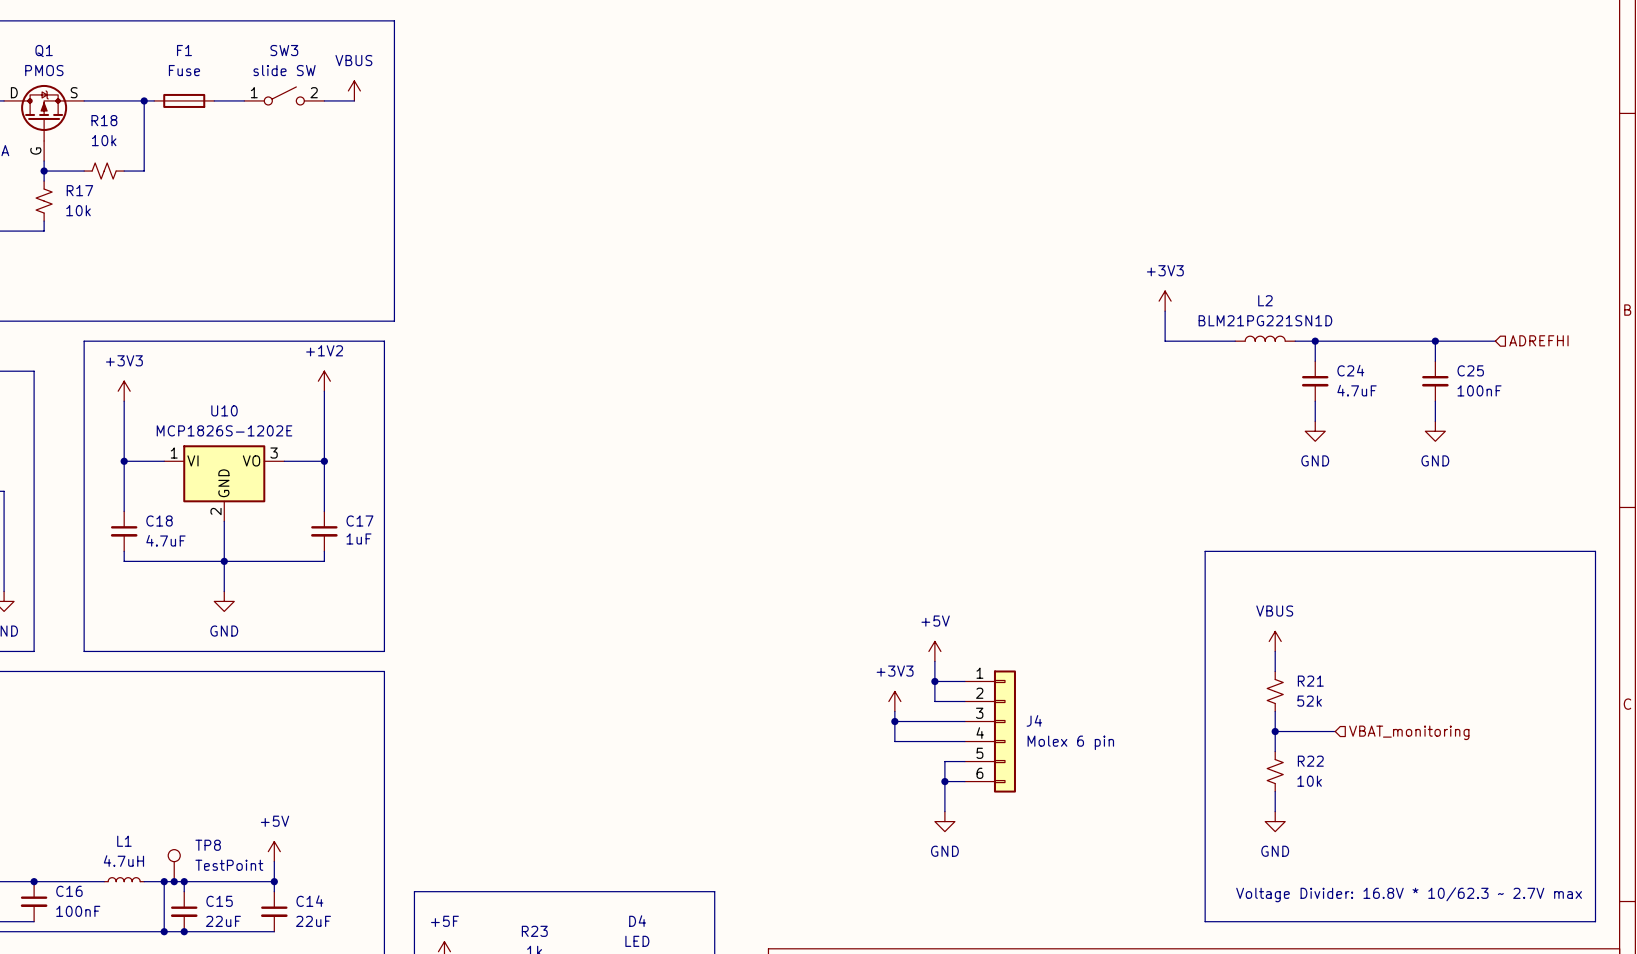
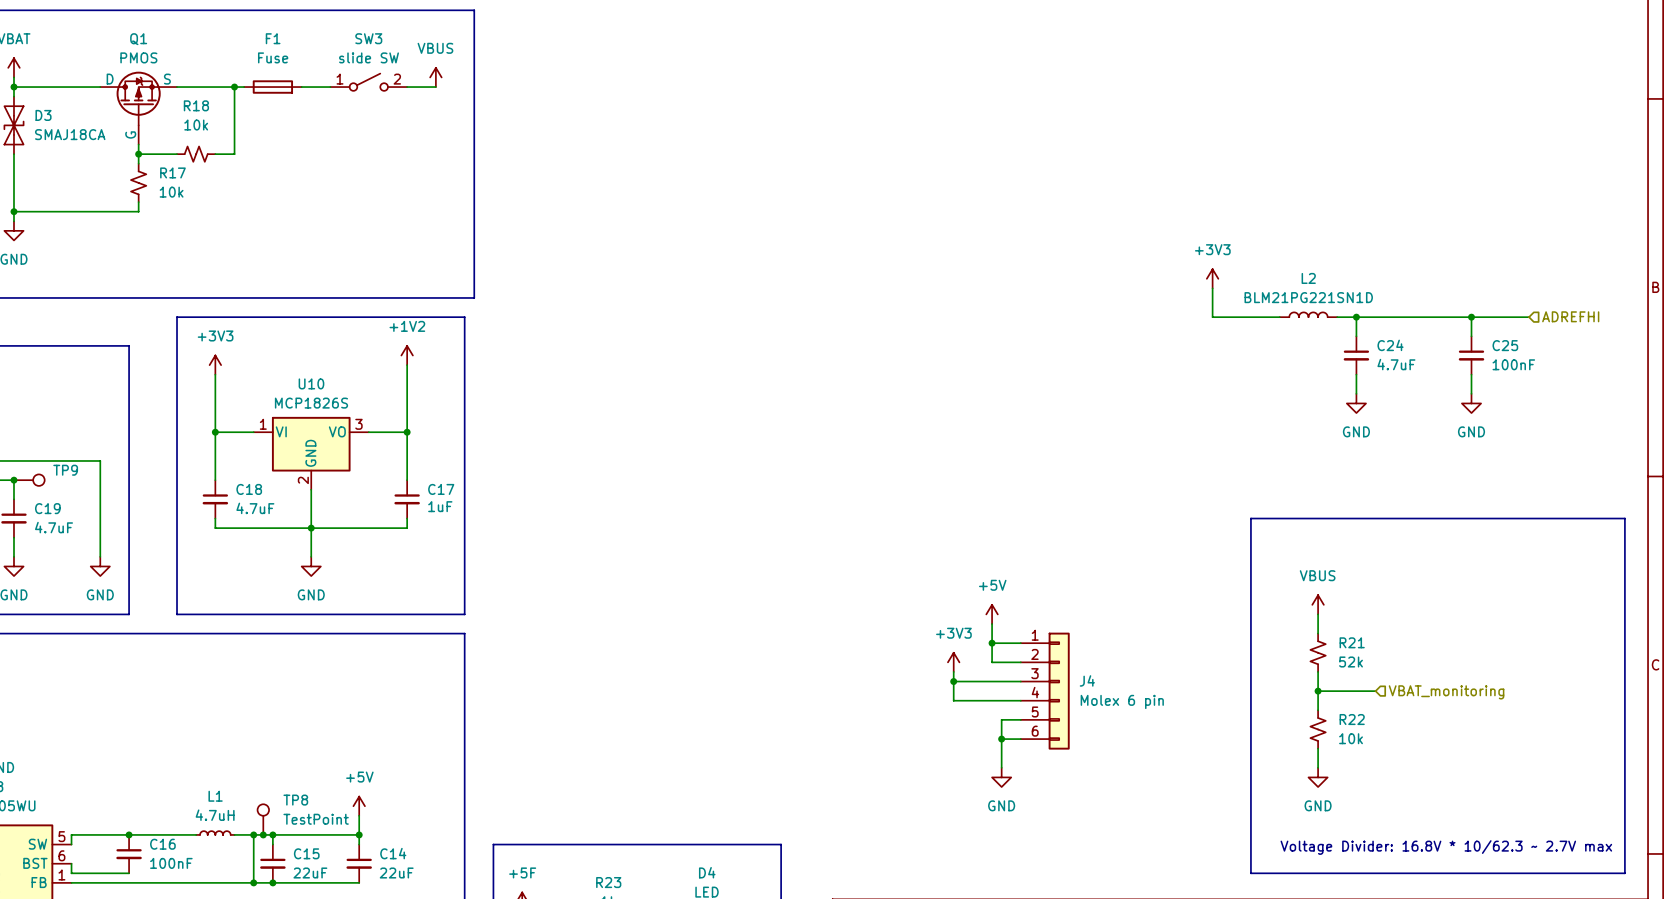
U10 value: MCP1826S-1202E (224, 430) -> MCP1826S (311, 403)

